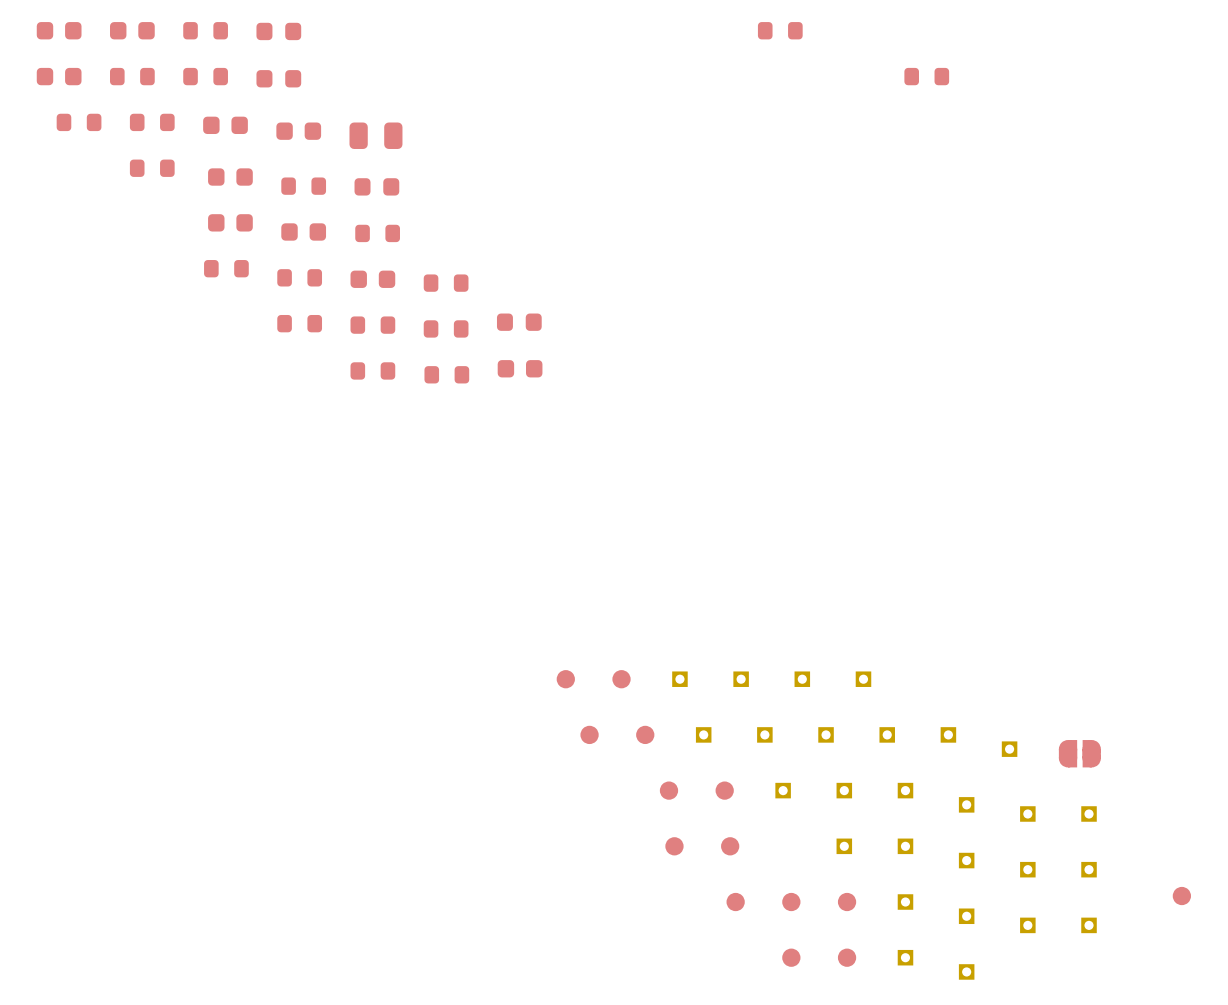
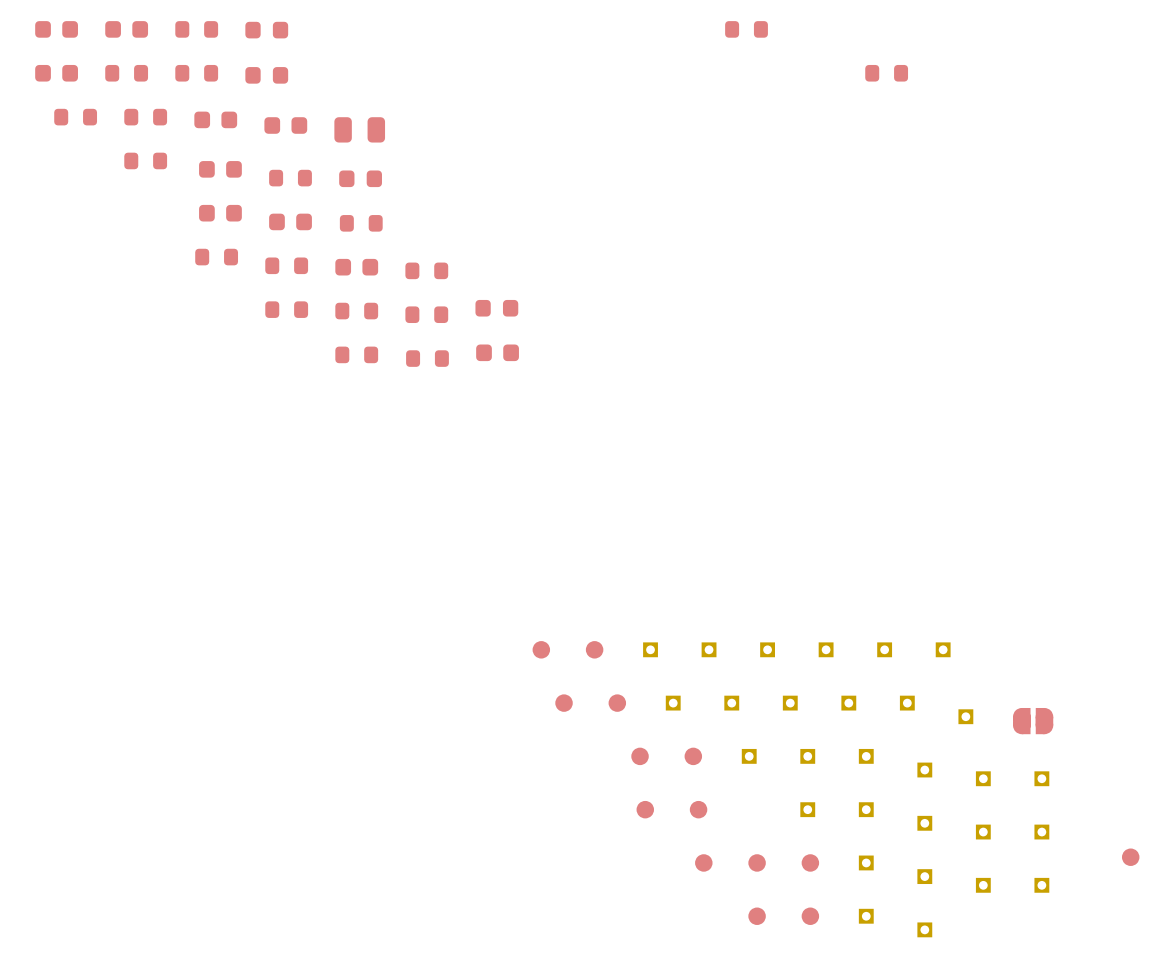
part: none -> (884, 649)
part: none -> (943, 649)

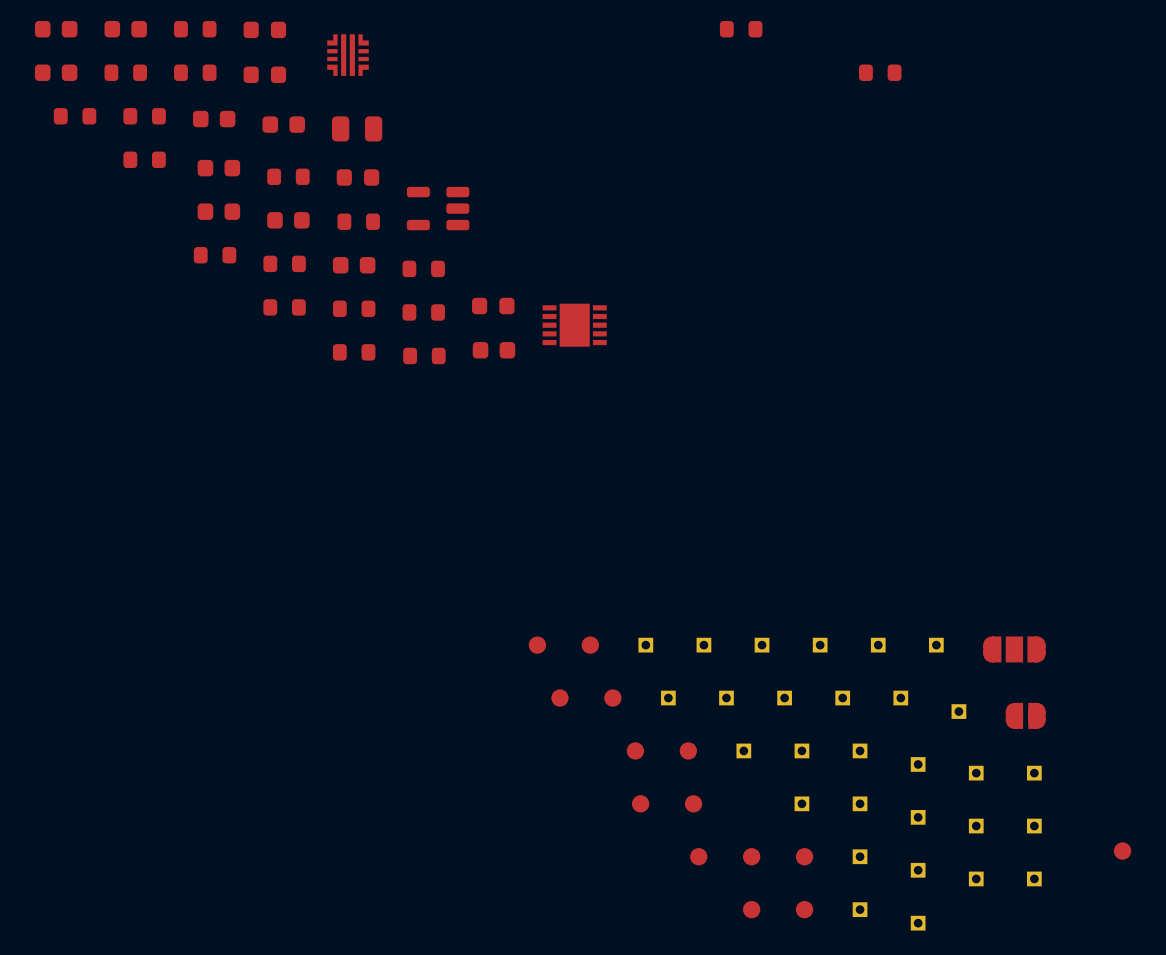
part: none -> (348, 55)
part: none -> (438, 208)
part: none -> (574, 325)
part: none -> (1014, 649)

